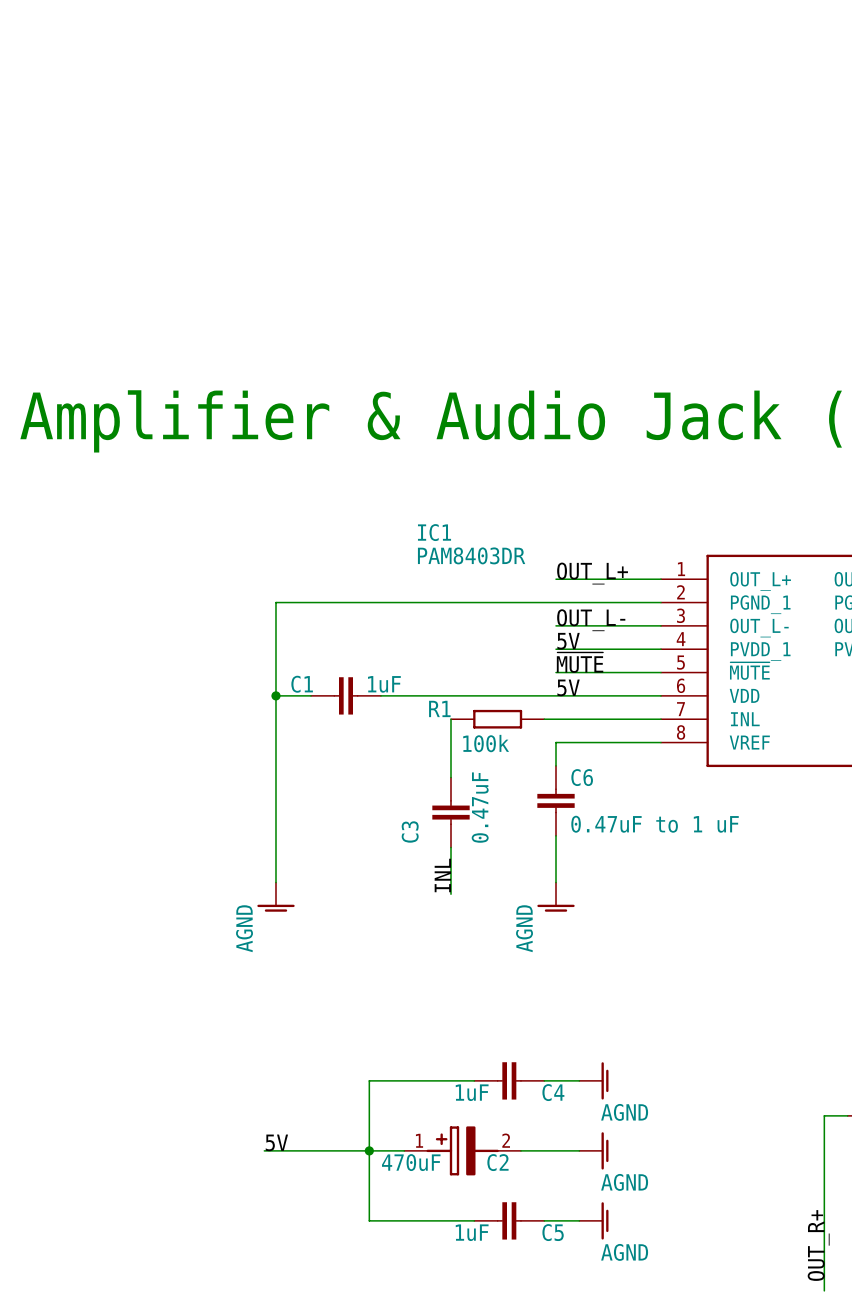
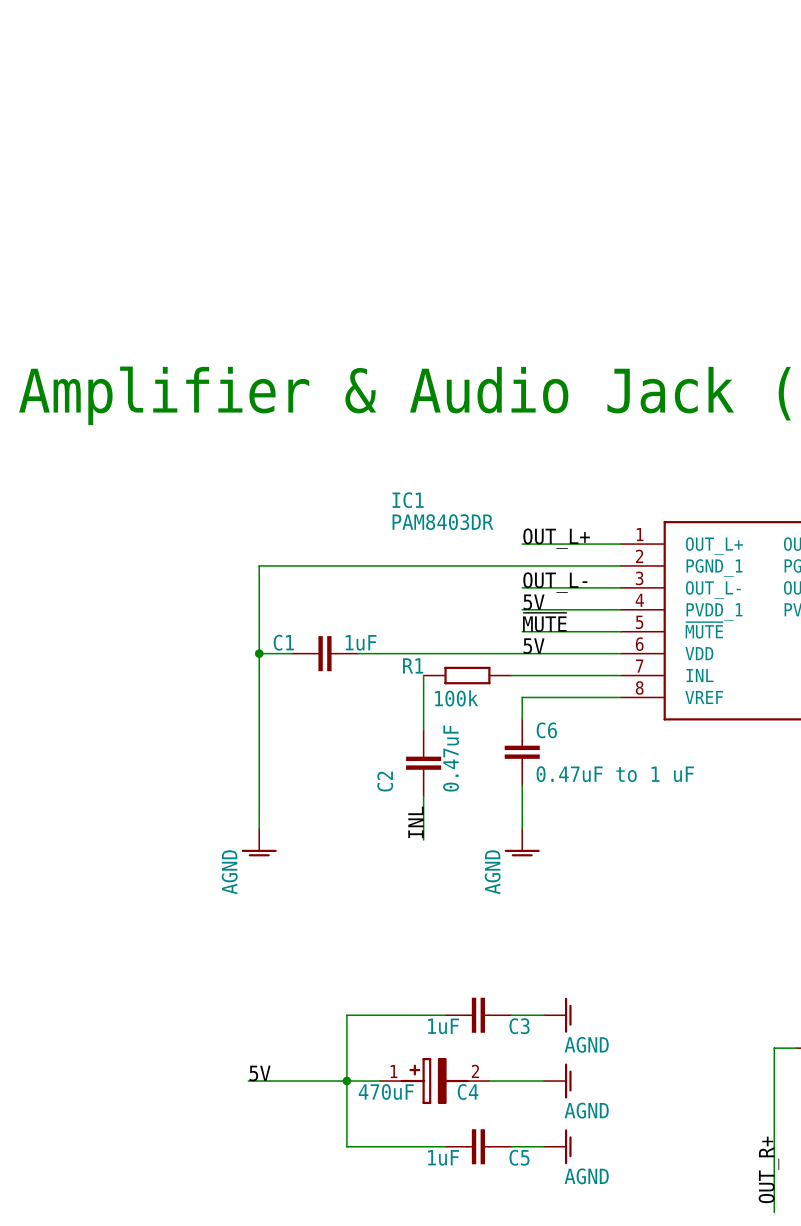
C3 name: C3 (410, 831) -> C2 (385, 781)
C4 name: C4 (553, 1092) -> C3 (519, 1026)
C2 name: C2 (497, 1162) -> C4 (468, 1091)

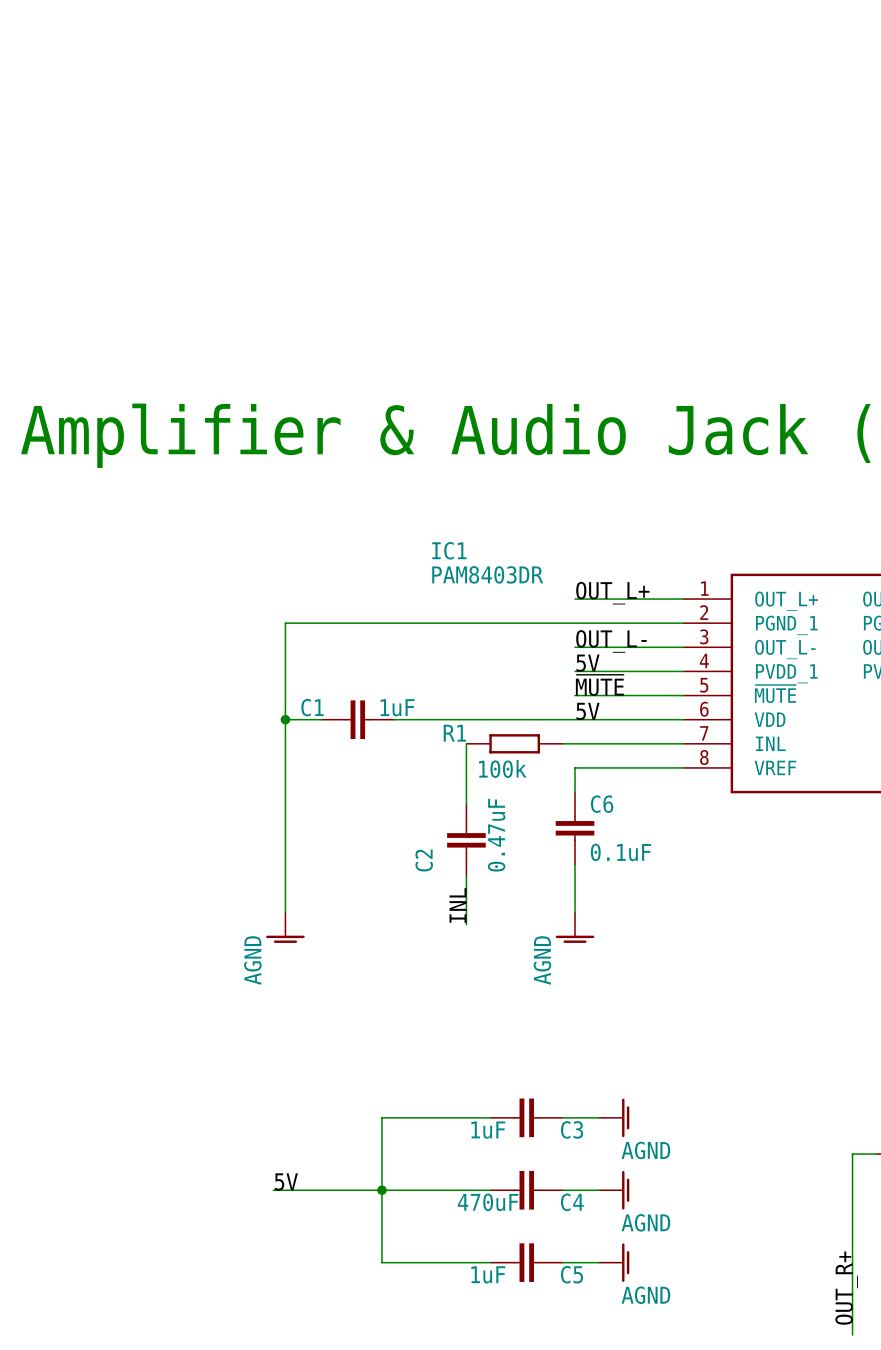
C6 value: 0.47uF to 1 uF (615, 774) -> 0.1uF (620, 852)
C4 symbol: [379, 1058, 490, 1105] -> [490, 1170, 563, 1210]

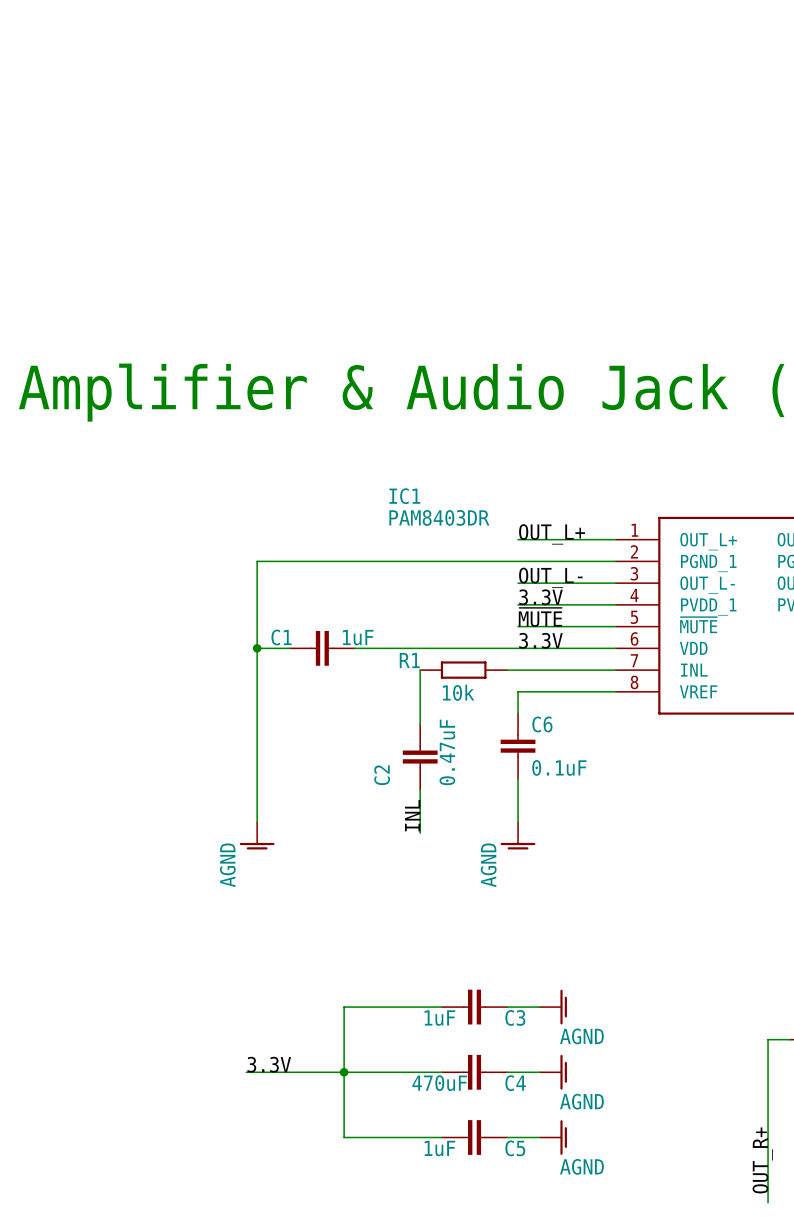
label: 5V (588, 663) -> 3.3V (541, 597)
label: 5V (588, 711) -> 3.3V (541, 640)
R1 value: 100k (502, 768) -> 10k (458, 692)
label: 5V (286, 1181) -> 3.3V (269, 1064)

